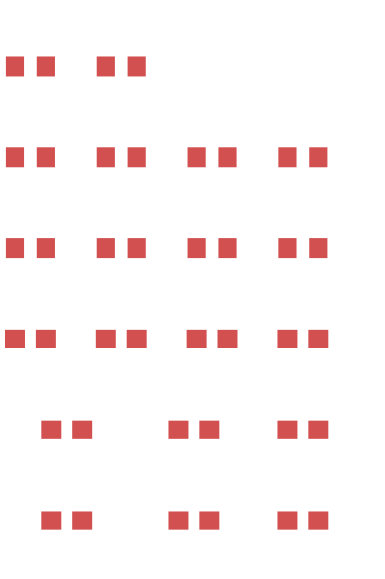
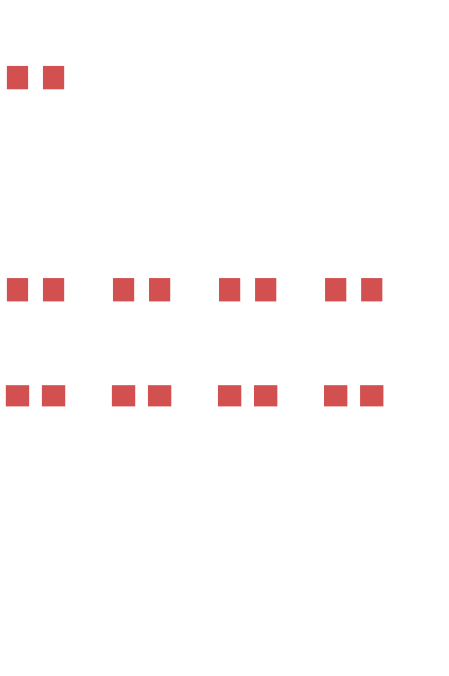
part: (121, 66) -> none
part: (30, 157) -> none
part: (121, 157) -> none
part: (212, 157) -> none
part: (302, 157) -> none
part: (66, 429) -> none
part: (193, 429) -> none
part: (302, 429) -> none
part: (66, 520) -> none
part: (193, 520) -> none
part: (302, 520) -> none

